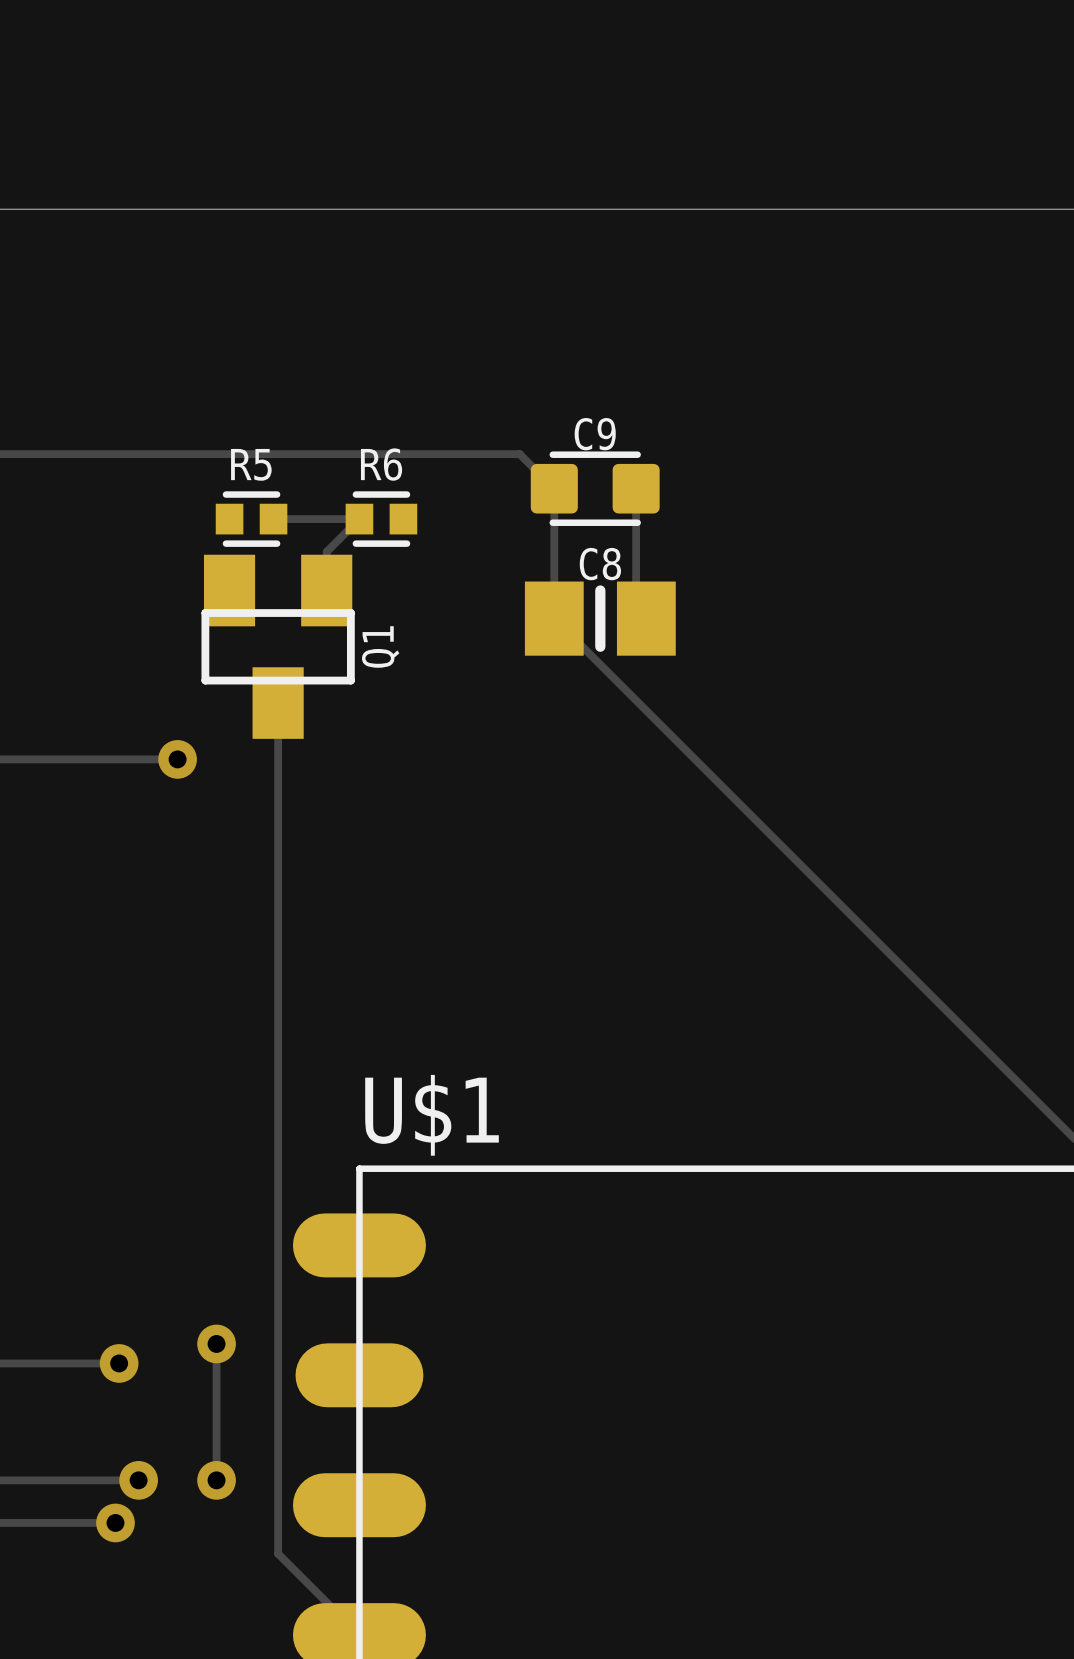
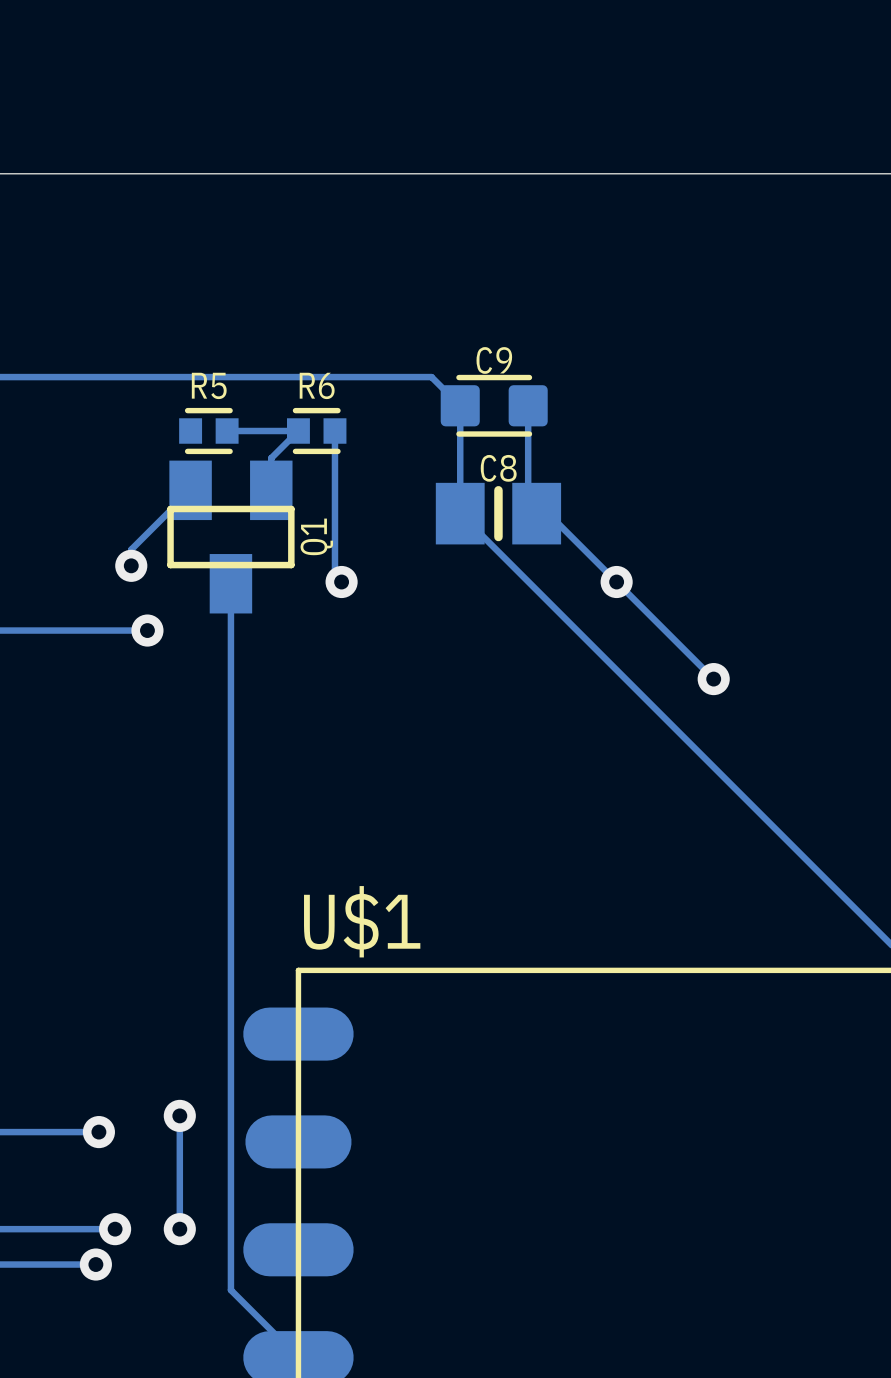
track: none -> (334, 431) (334, 575) (341, 582)
track: none -> (190, 490) (131, 549) (131, 565)
track: none -> (536, 513) (548, 513) (713, 679)
via: none -> (131, 565)
via: none -> (341, 582)
via: none -> (616, 582)
via: none -> (713, 679)

